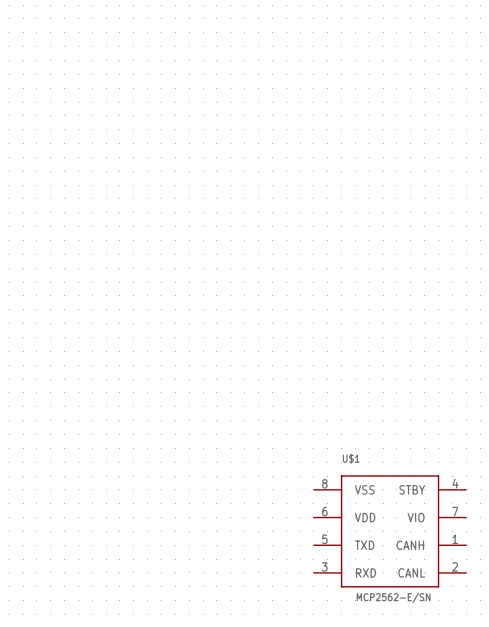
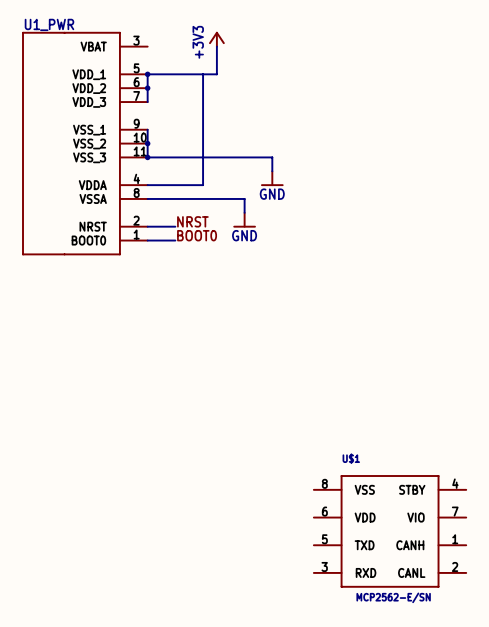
power symbol: none -> +3V3 (216, 39)
wire: none -> (216, 46) (216, 74) (147, 74) (147, 102)
junction: none -> (147, 74)
wire: none -> (203, 74) (203, 185) (147, 185)
junction: none -> (147, 88)
wire: none -> (147, 129) (147, 157) (272, 157) (272, 171)
U1_PWR: none -> (84, 143)
junction: none -> (147, 143)
junction: none -> (147, 157)
power symbol: none -> GND (272, 178)
wire: none -> (147, 198) (244, 198) (244, 212)
power symbol: none -> GND (244, 220)
label: none -> NRST (192, 221)
wire: none -> (147, 226) (175, 226)
label: none -> BOOT0 (197, 235)
wire: none -> (147, 240) (175, 240)

